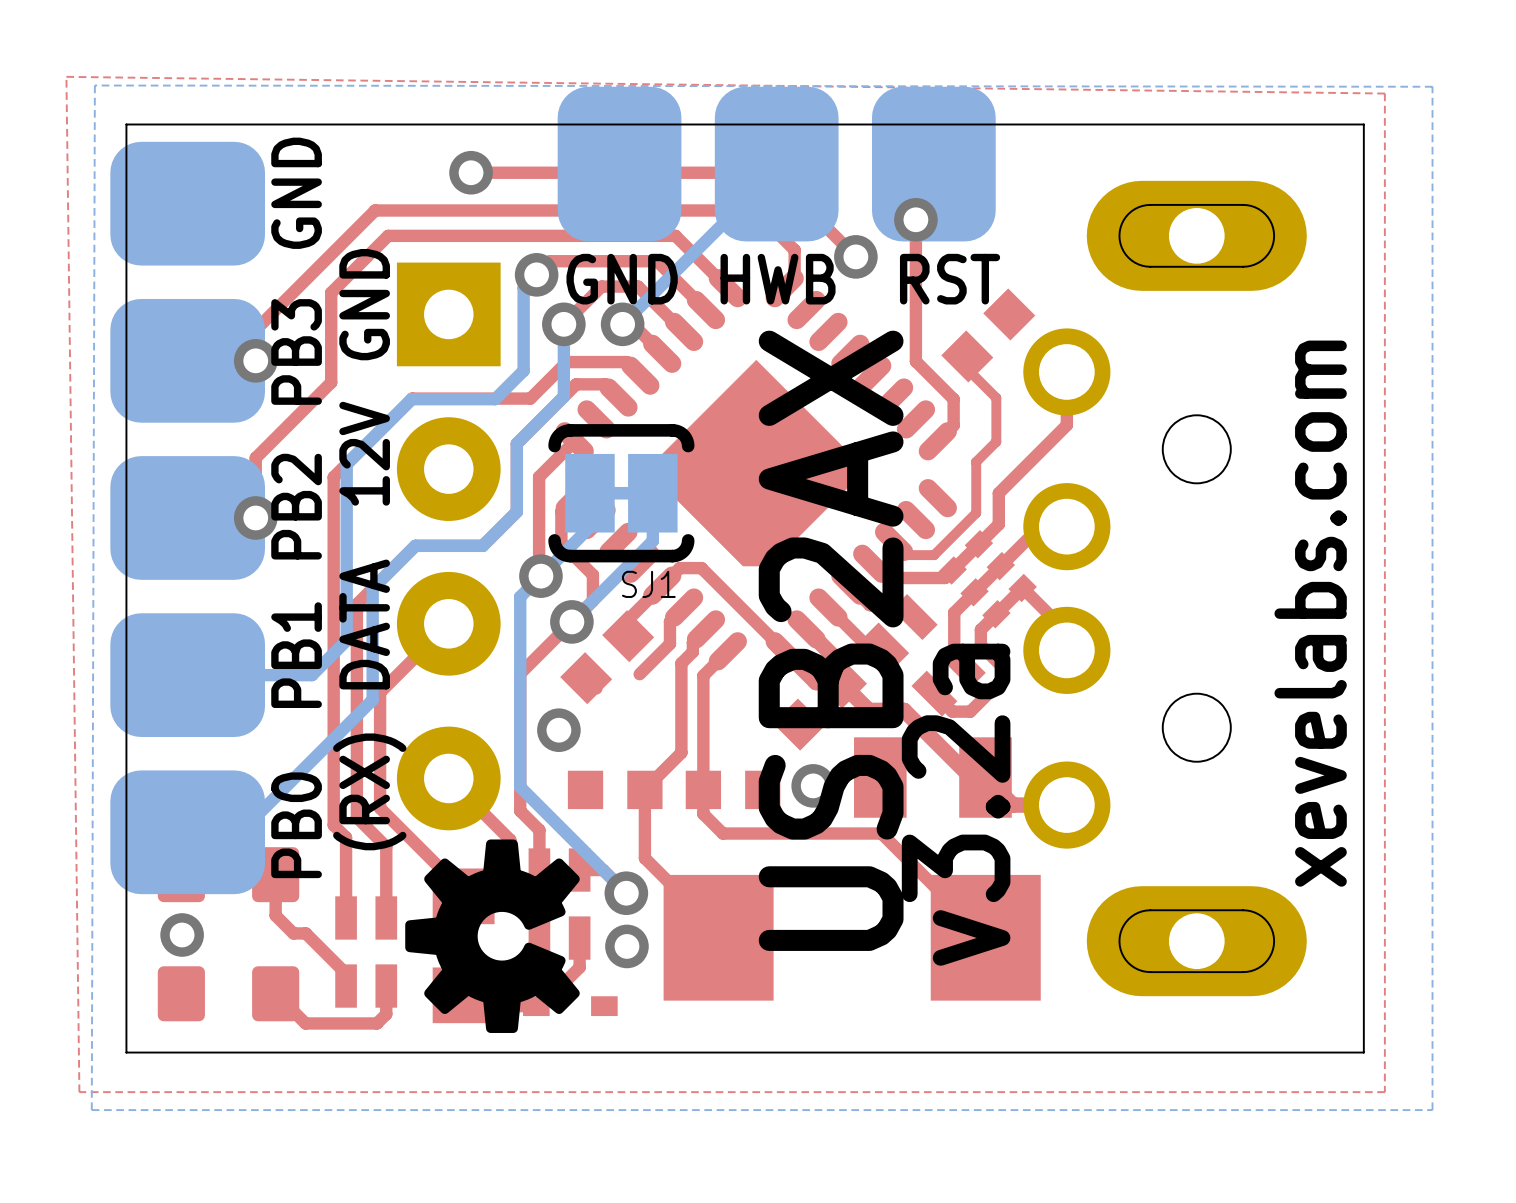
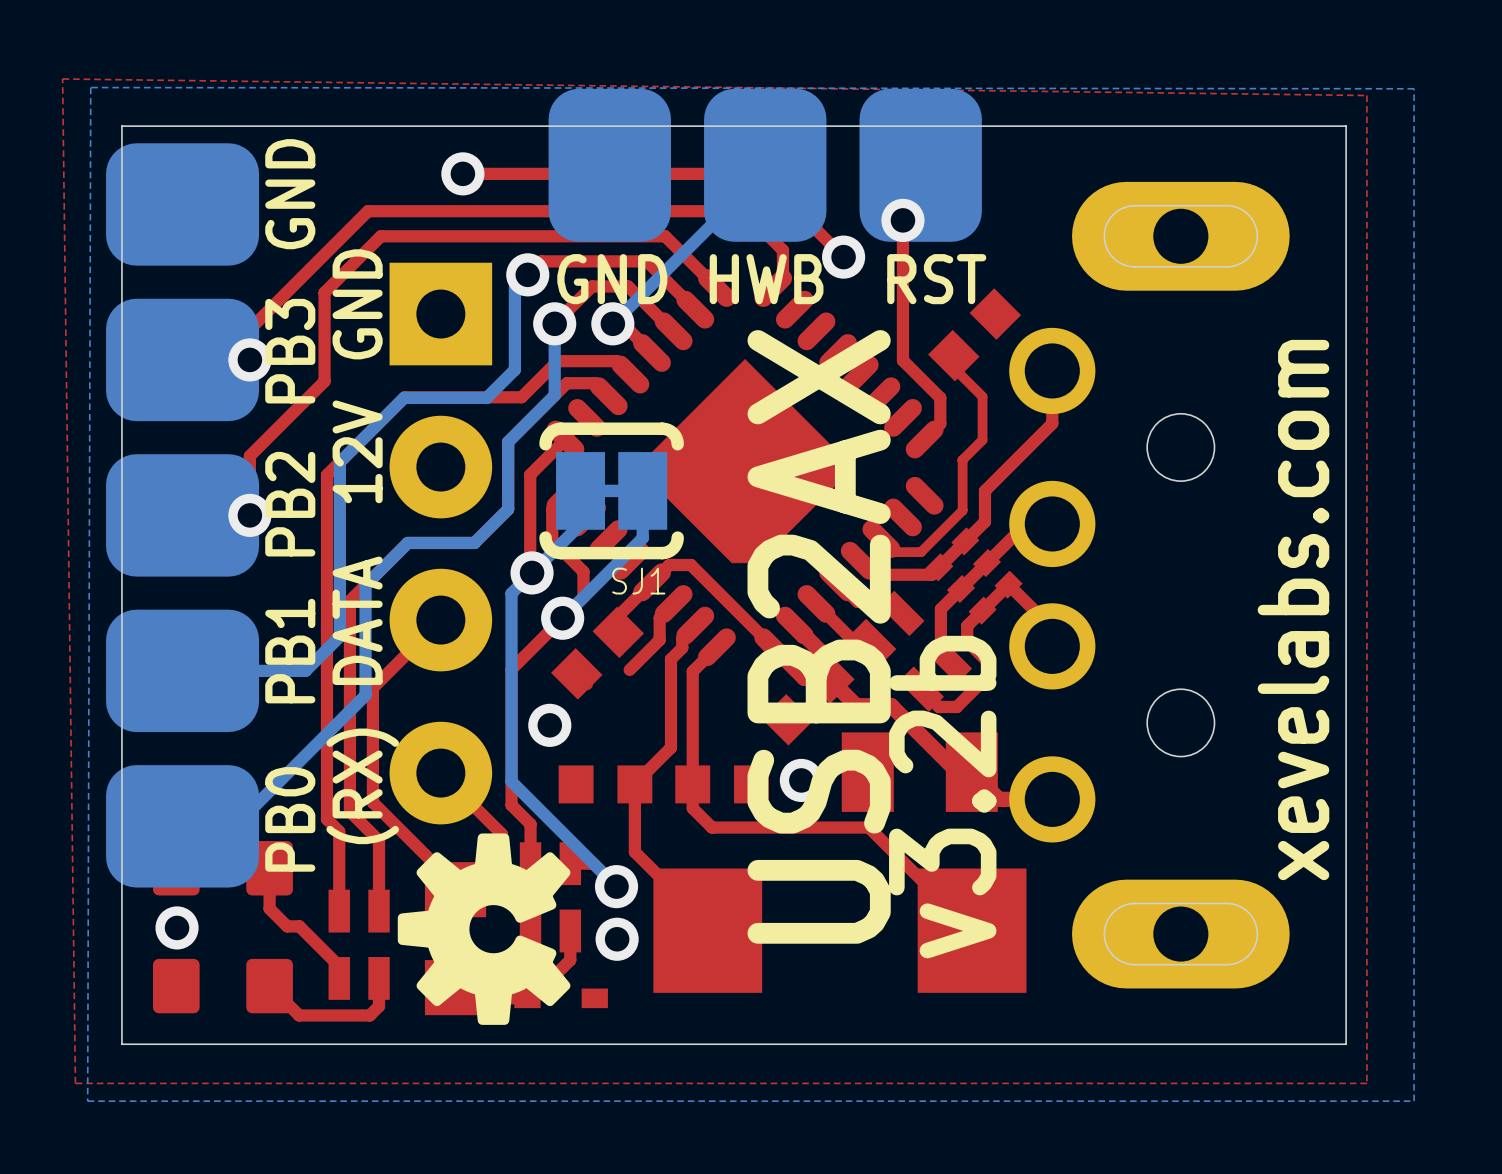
text: v3.2a (956, 804) -> v3.2b (942, 797)

